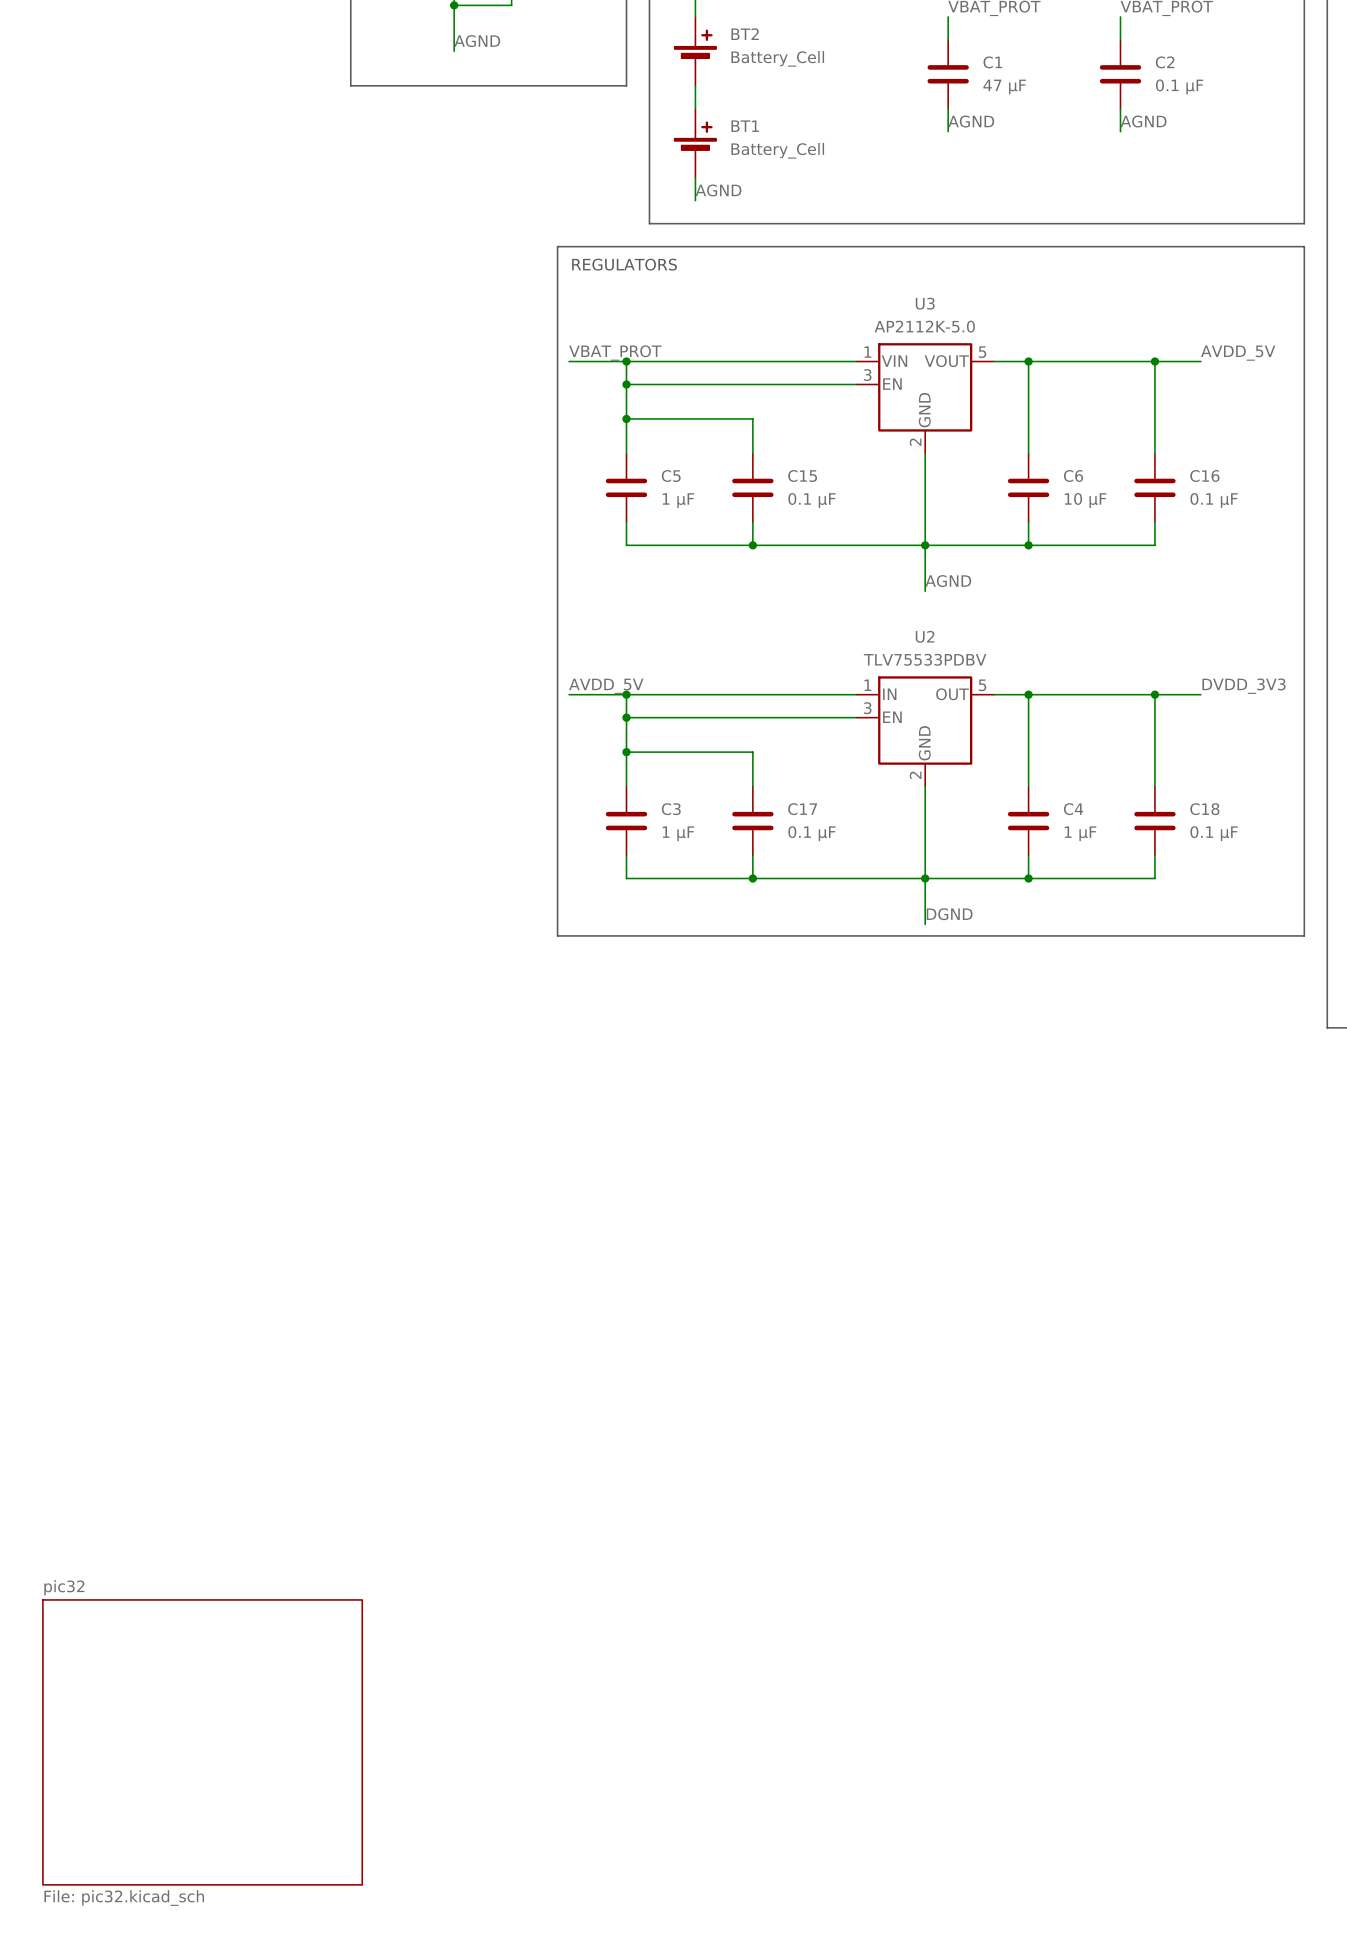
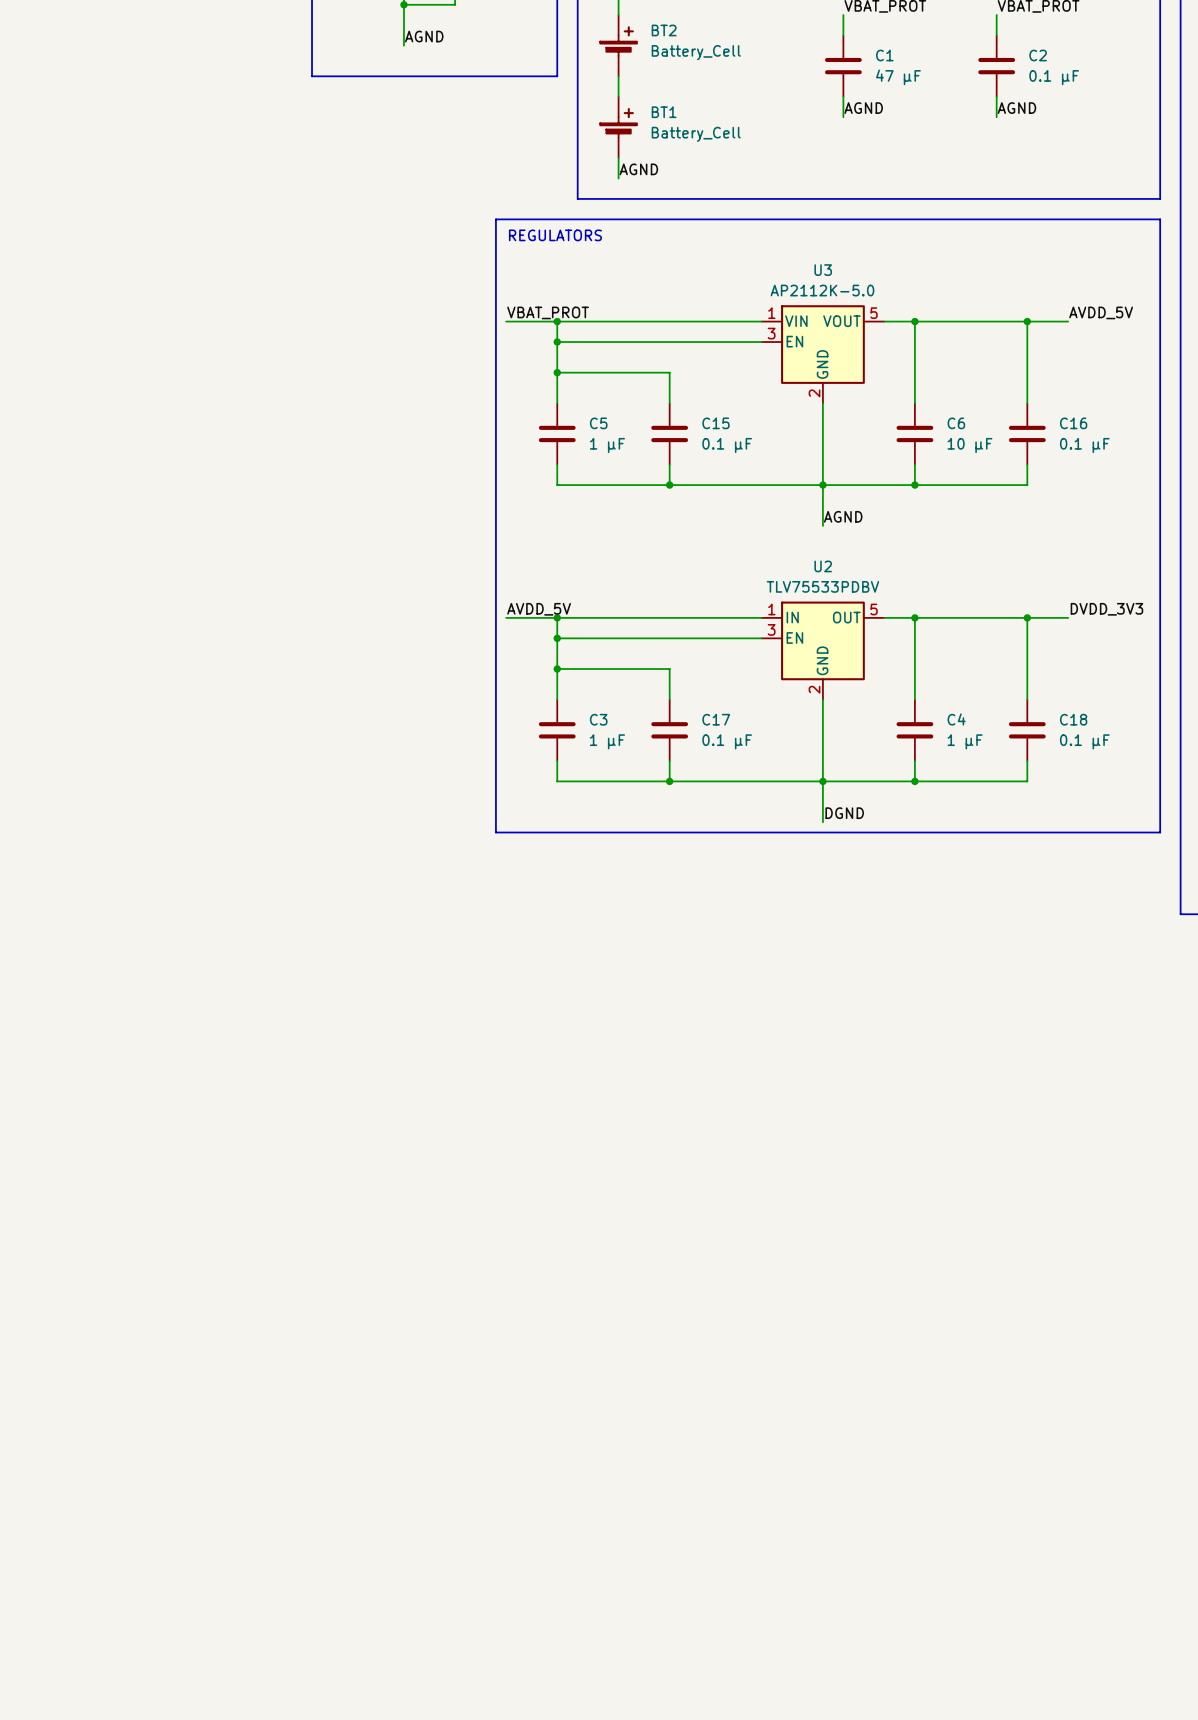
sheet pic32: File: pic32.kicad_sch (202, 1742) -> none

